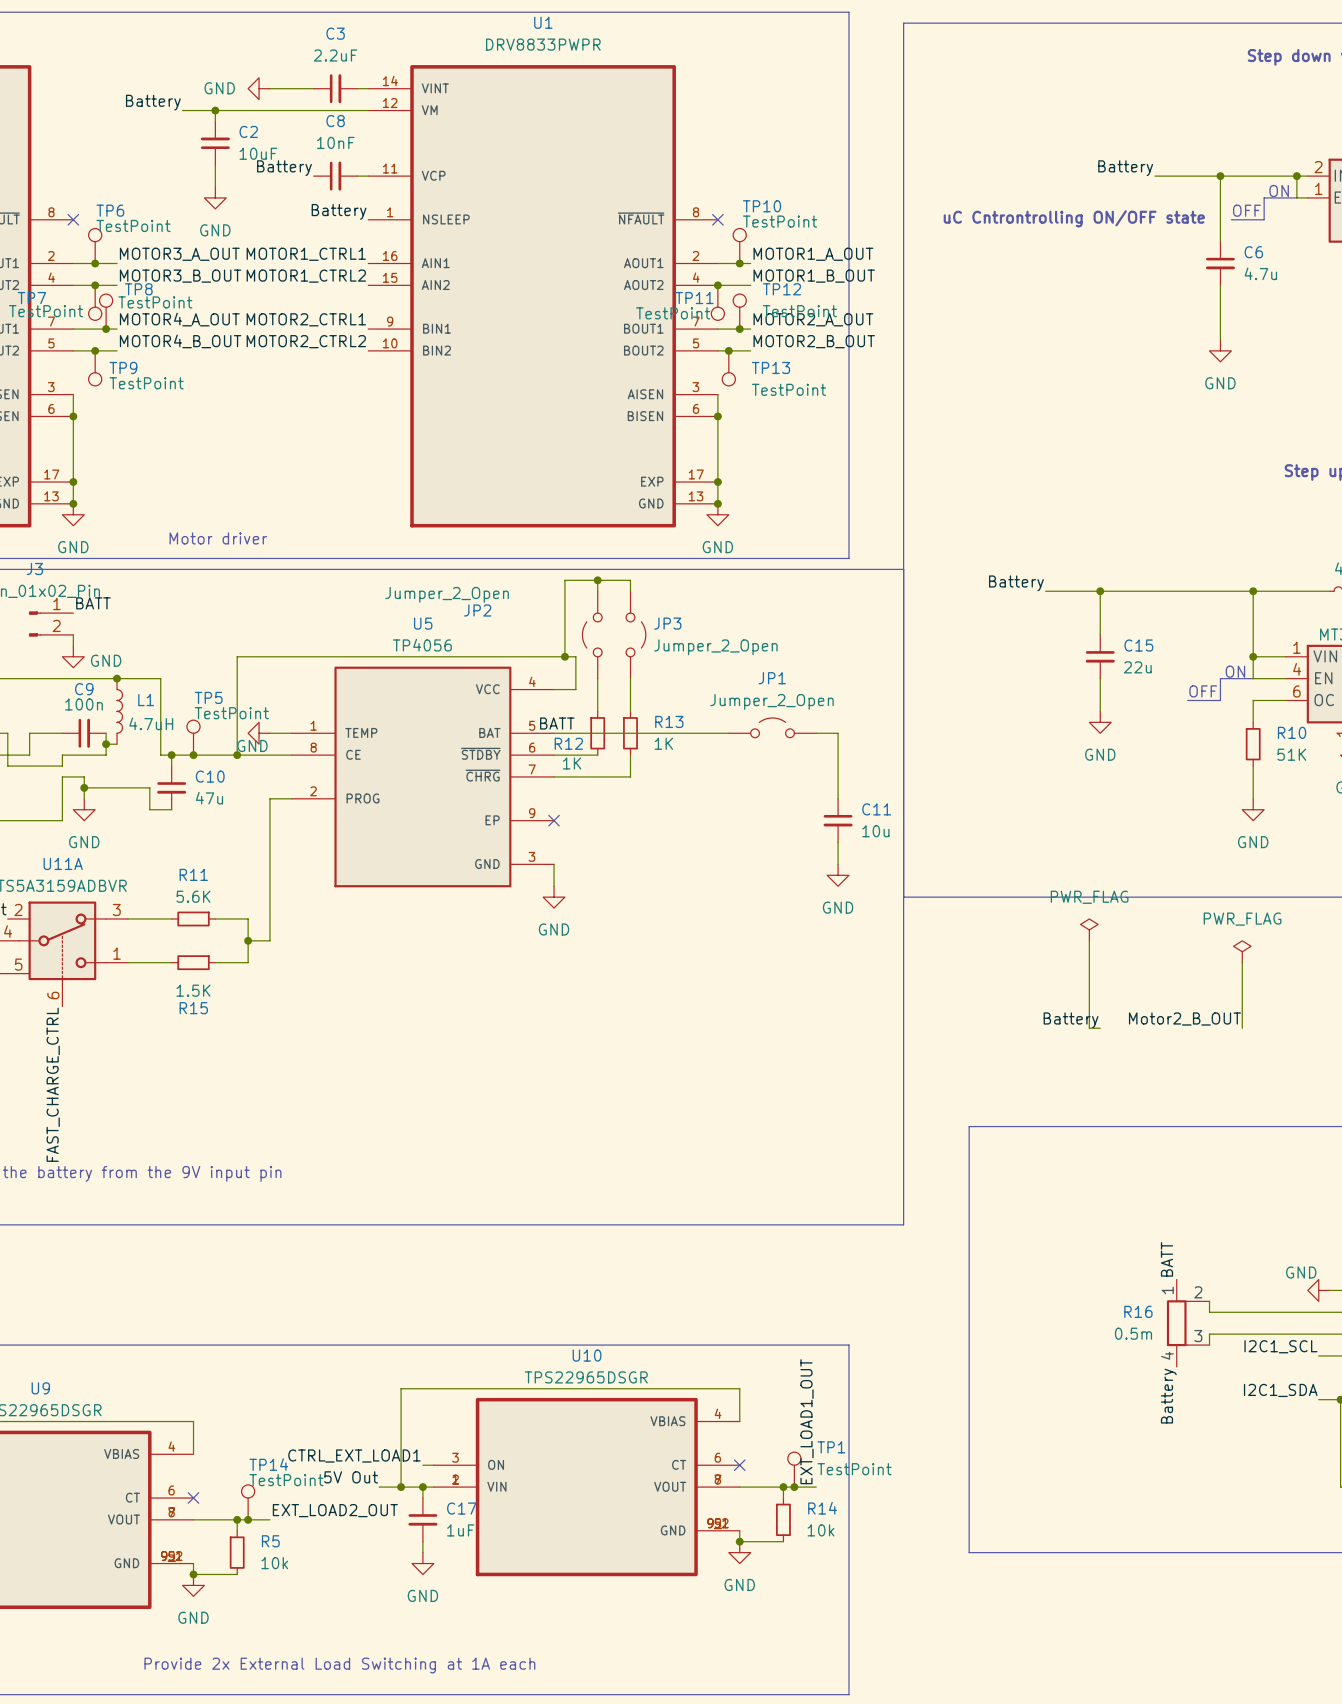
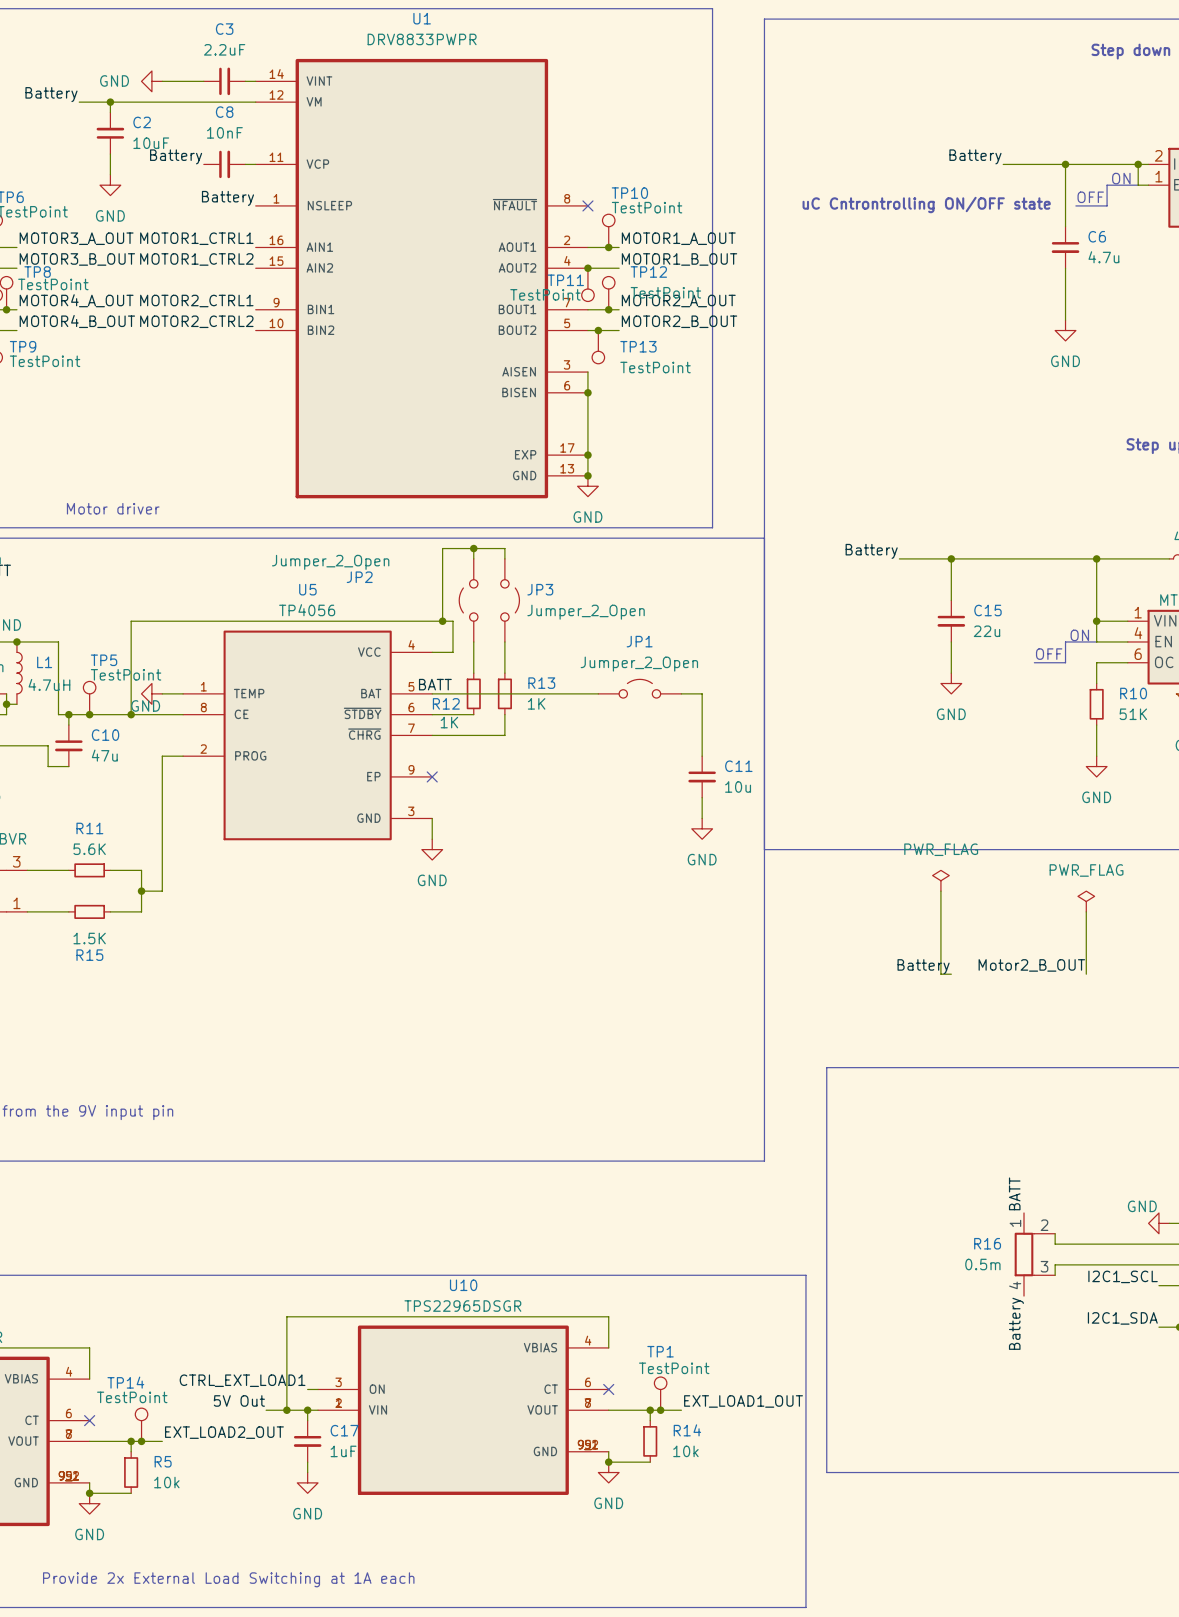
line: (848, 1345) (848, 1694) -> (712, 1275) (805, 1275) (805, 1607) (712, 1607)
label rotation: 0° (806, 1421) -> 90° clockwise (743, 1401)
TP1 name position: TP1 (831, 1447) -> TP1 (660, 1351)
TP14 name position: TP14 (268, 1464) -> TP14 (125, 1382)
TP1 value position: TestPoint (854, 1469) -> TestPoint (674, 1368)
TP14 value position: TestPoint (286, 1480) -> TestPoint (132, 1397)

